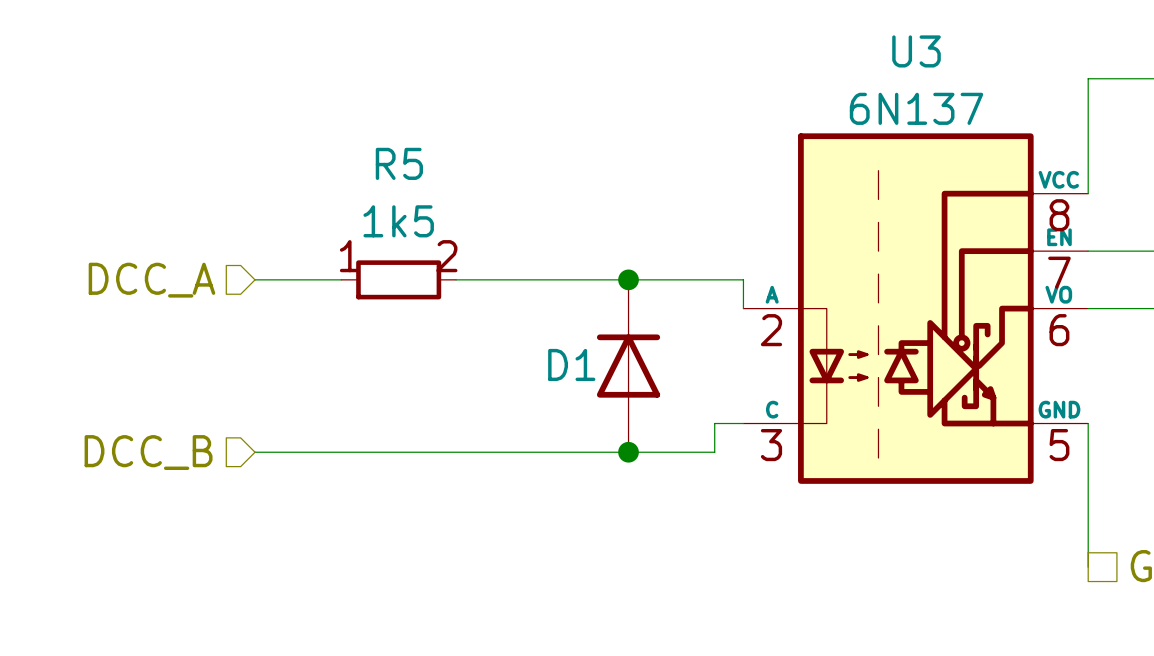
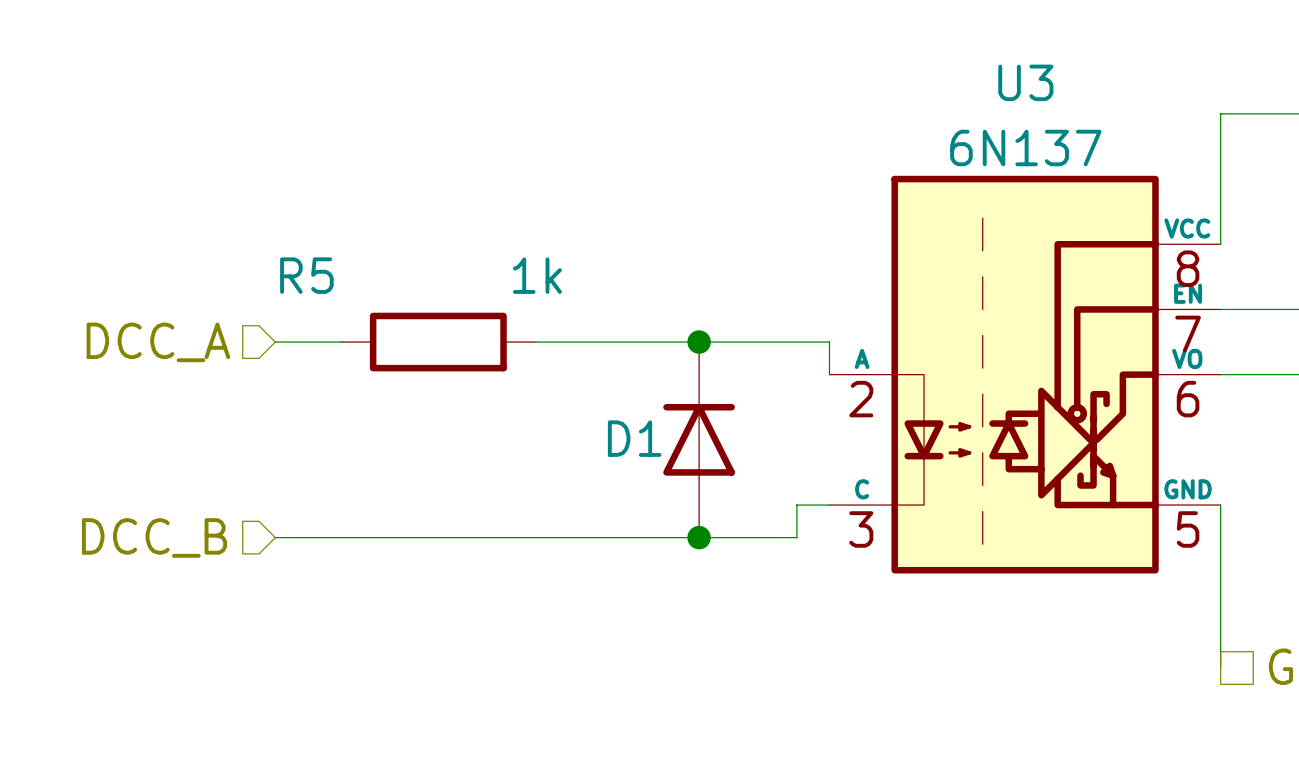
R5 name position: R5 (399, 163) -> R5 (306, 275)
R5 value: 1k5 (398, 221) -> 1k (537, 275)
R5 symbol: [341, 260, 457, 300] -> [340, 312, 537, 372]

